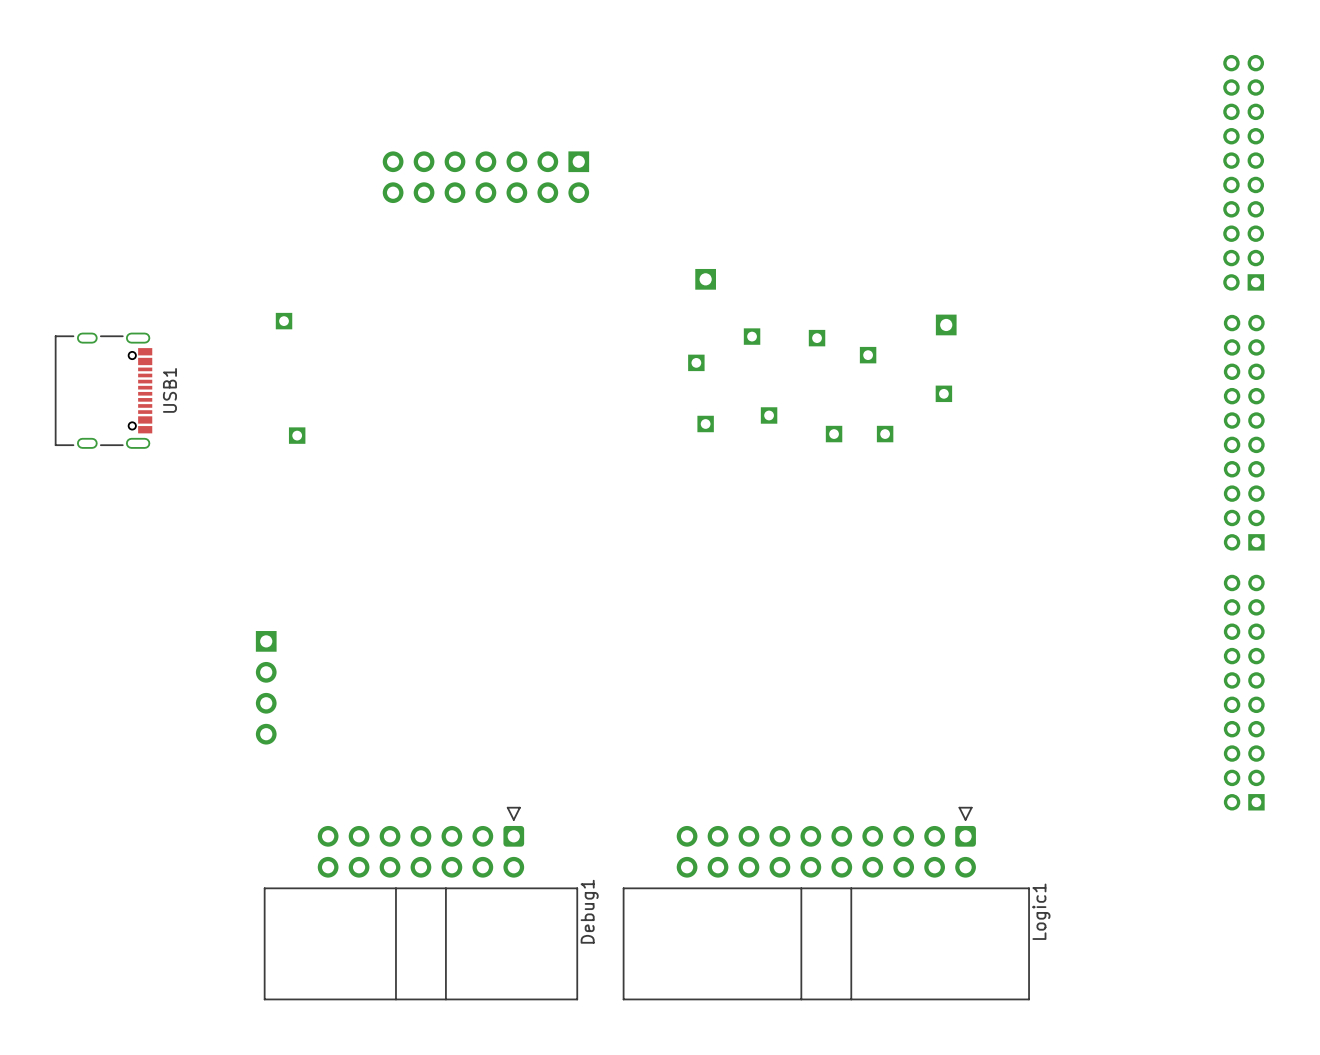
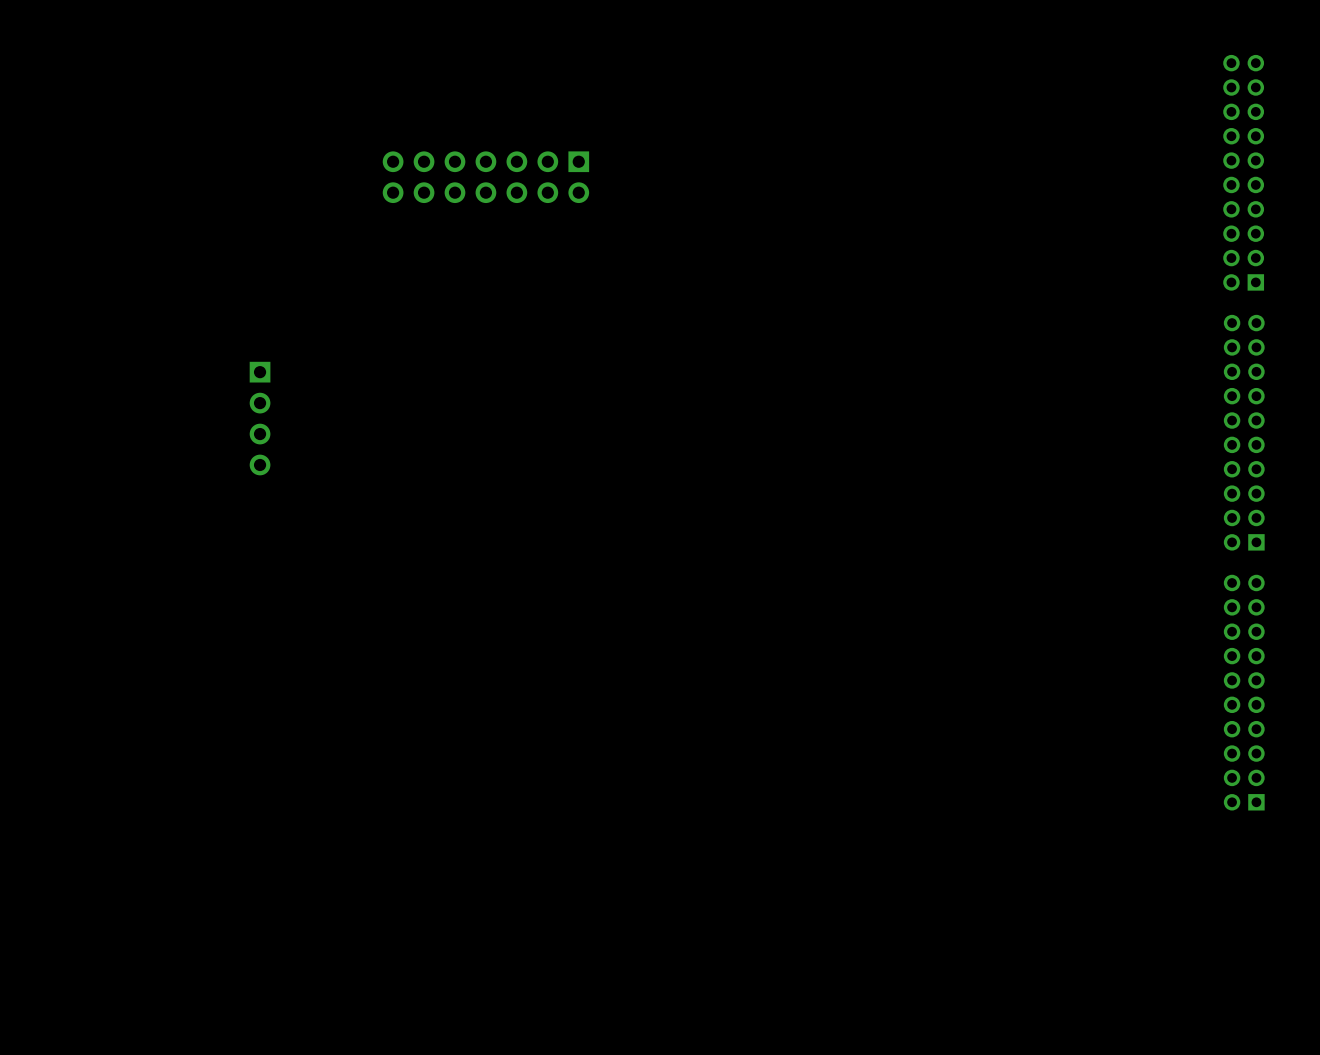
part: (705, 279) -> none
part: (284, 321) -> none
part: (946, 324) -> none
part: (752, 336) -> none
part: (817, 338) -> none
part: (868, 355) -> none
part: (696, 362) -> none
USB1: (103, 390) -> none
part: (943, 393) -> none
part: (769, 415) -> none
part: (705, 423) -> none
part: (834, 434) -> none
part: (885, 434) -> none
part: (297, 435) -> none
part position: (266, 687) -> (260, 418)
Debug1: (420, 903) -> none
Logic1: (826, 903) -> none

